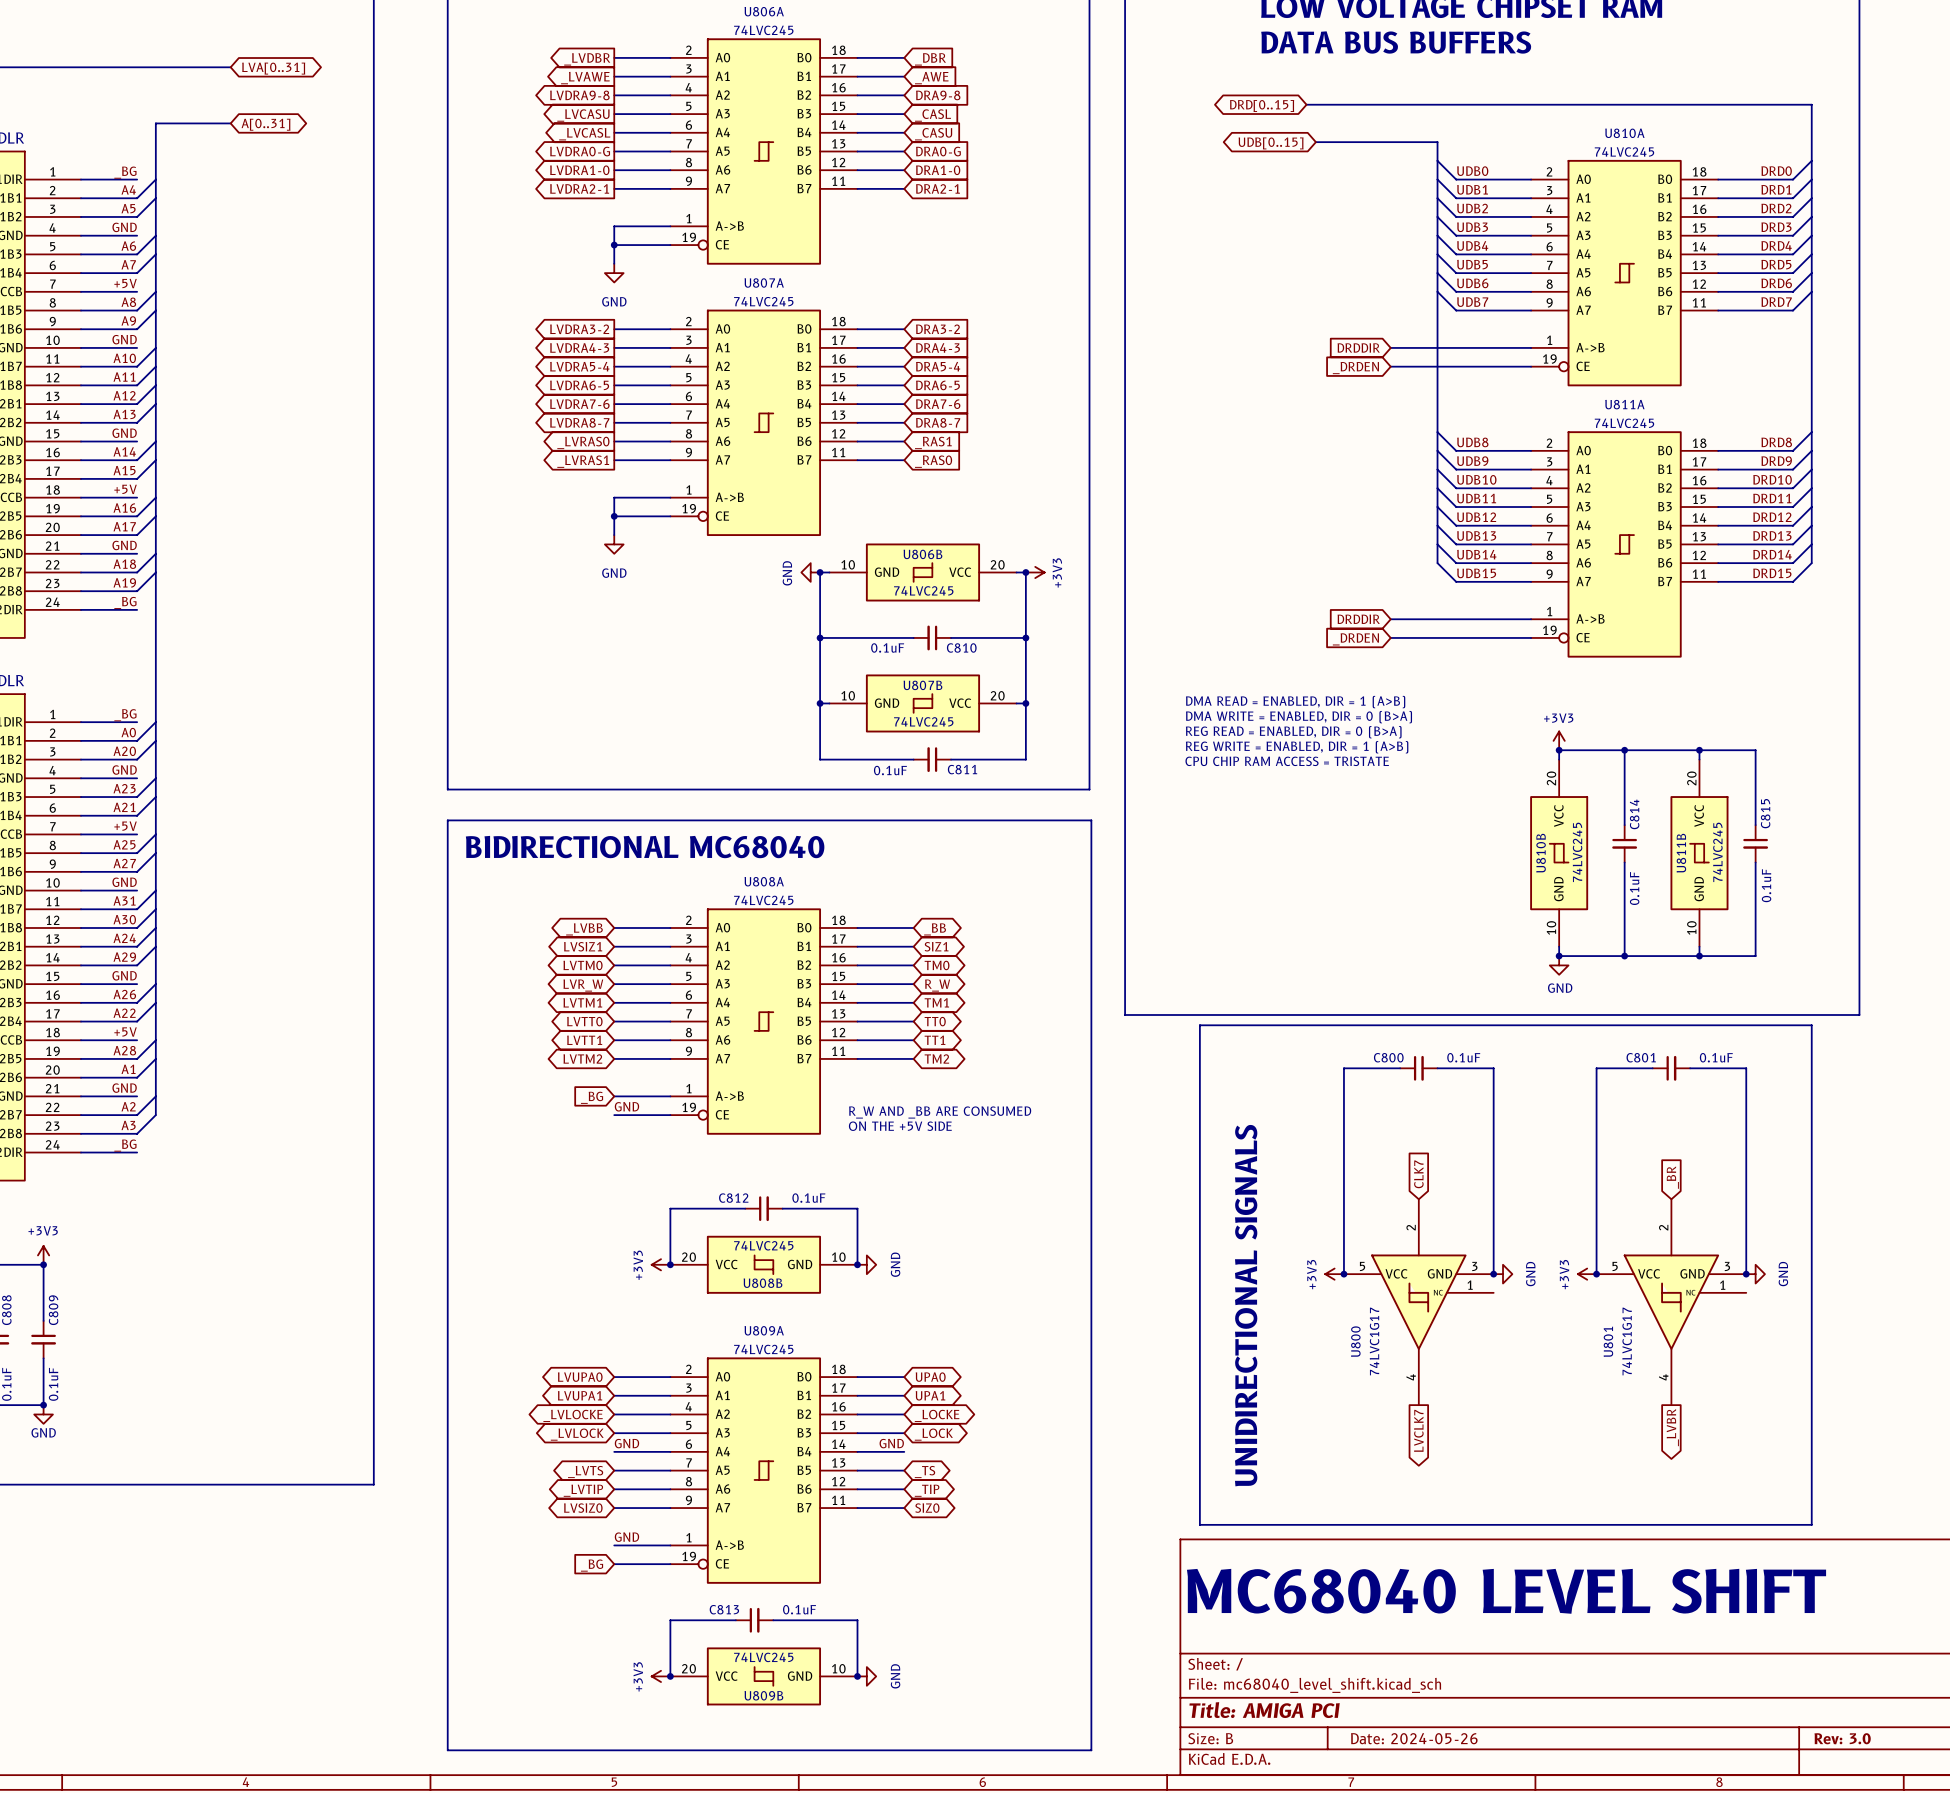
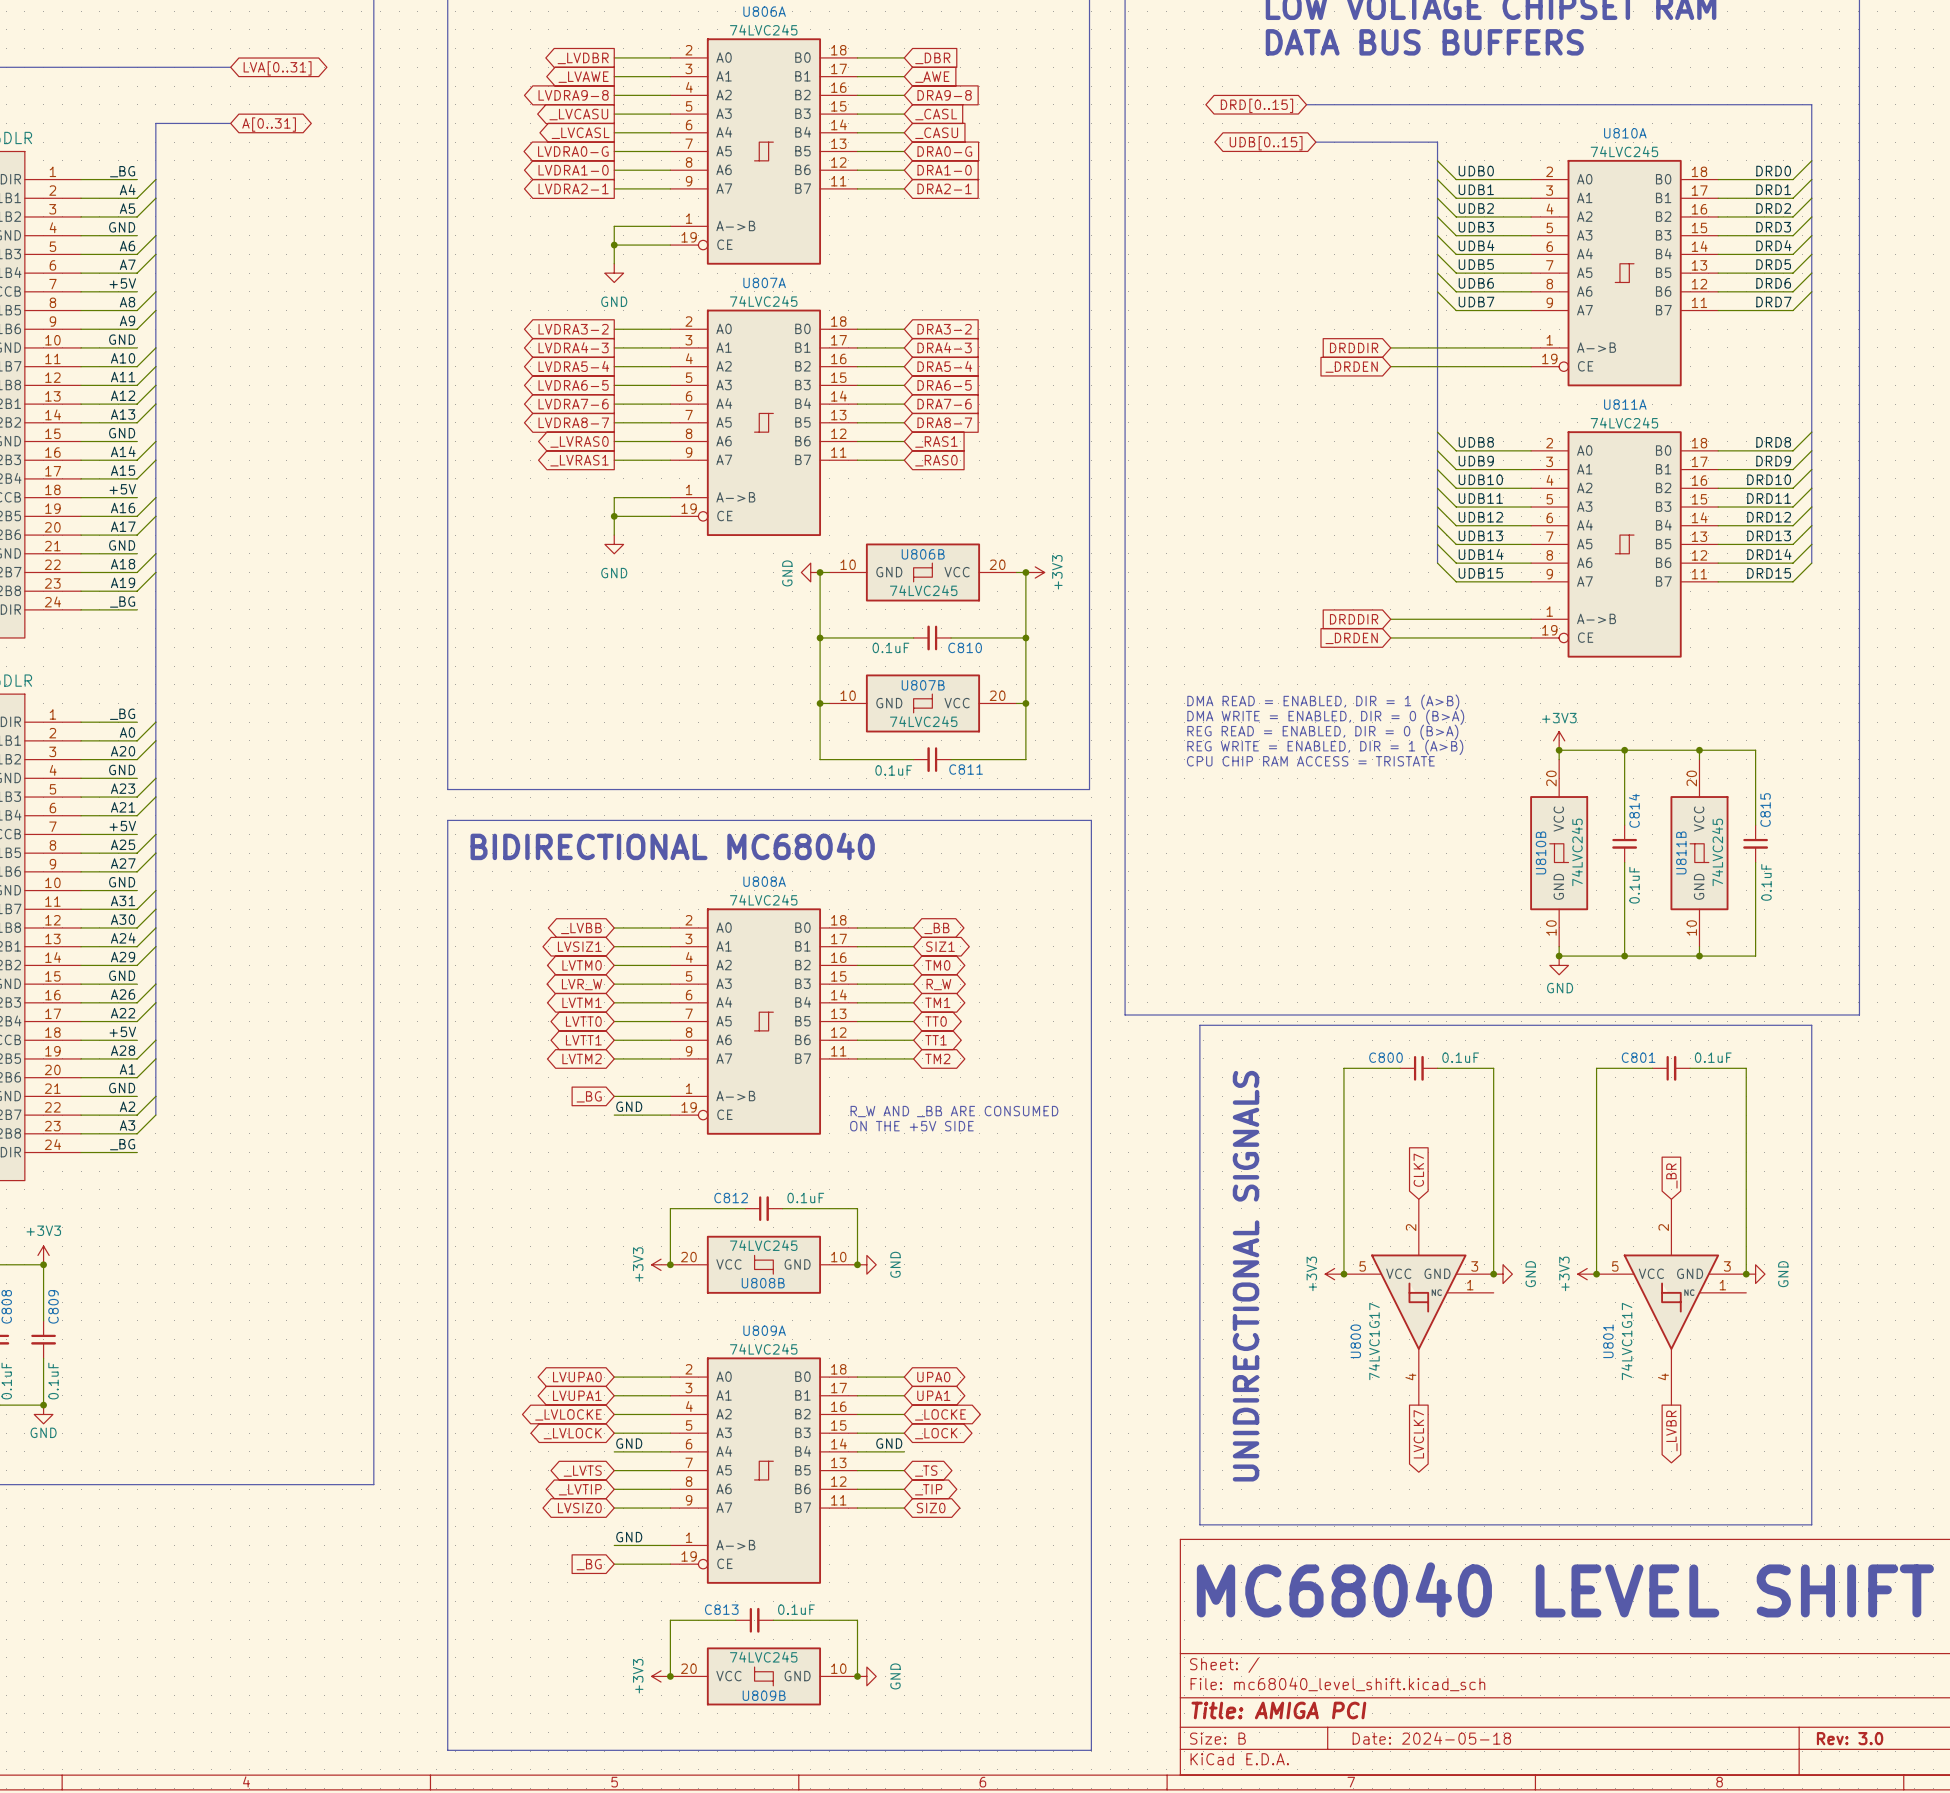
title block: Date: 2024-05-26 (1414, 1738) -> Date: 2024-05-18 (1431, 1738)

